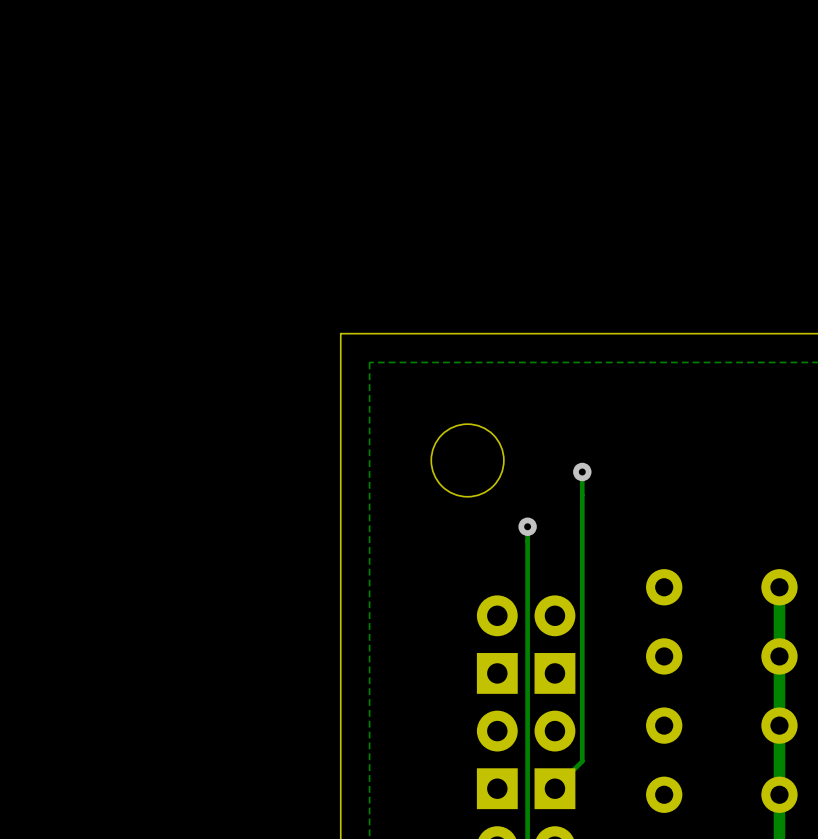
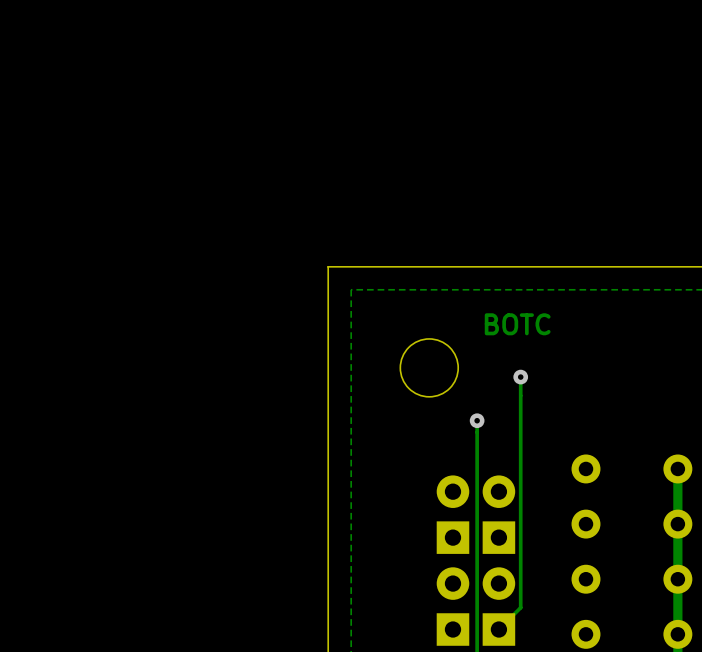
text: none -> BOTC (517, 324)

